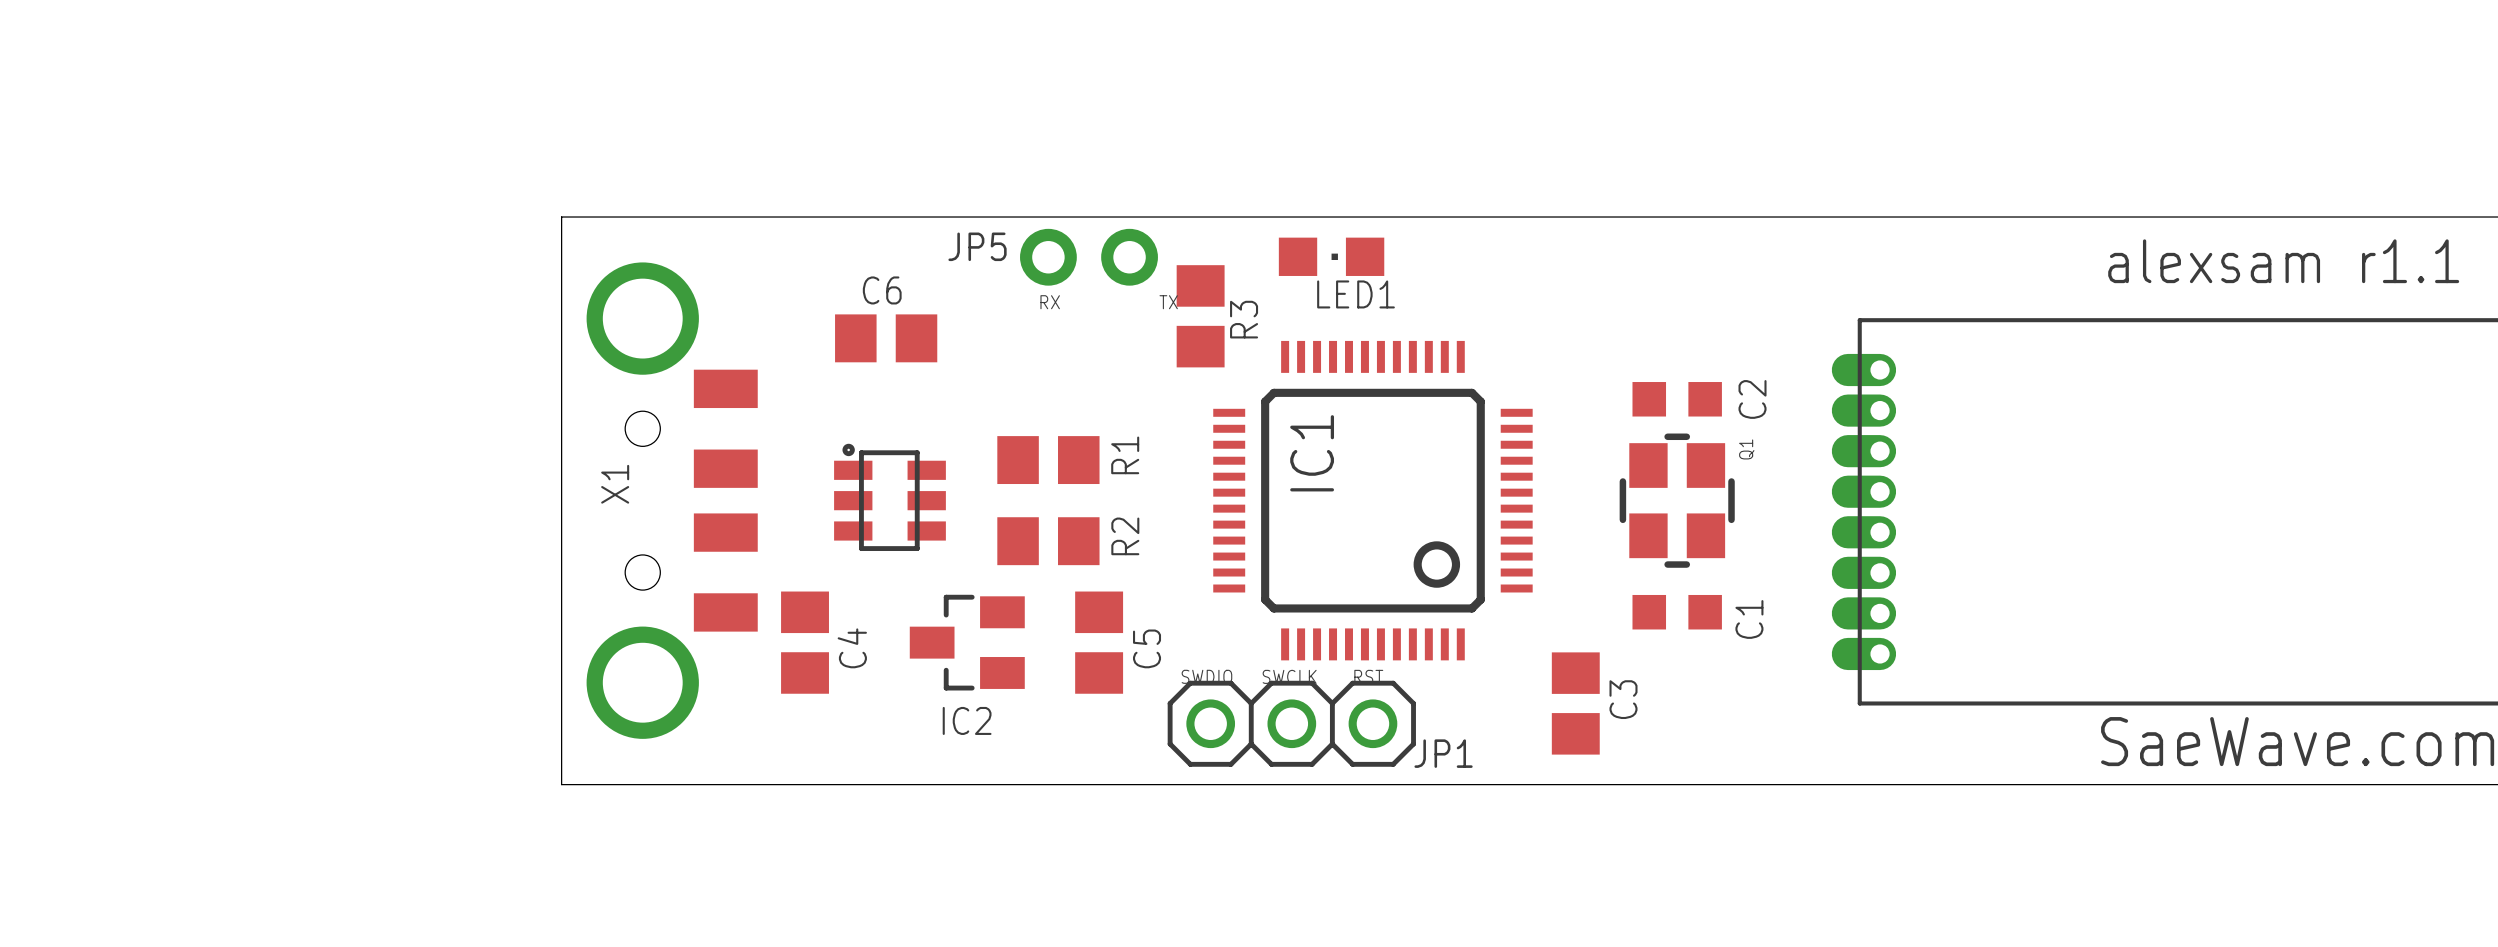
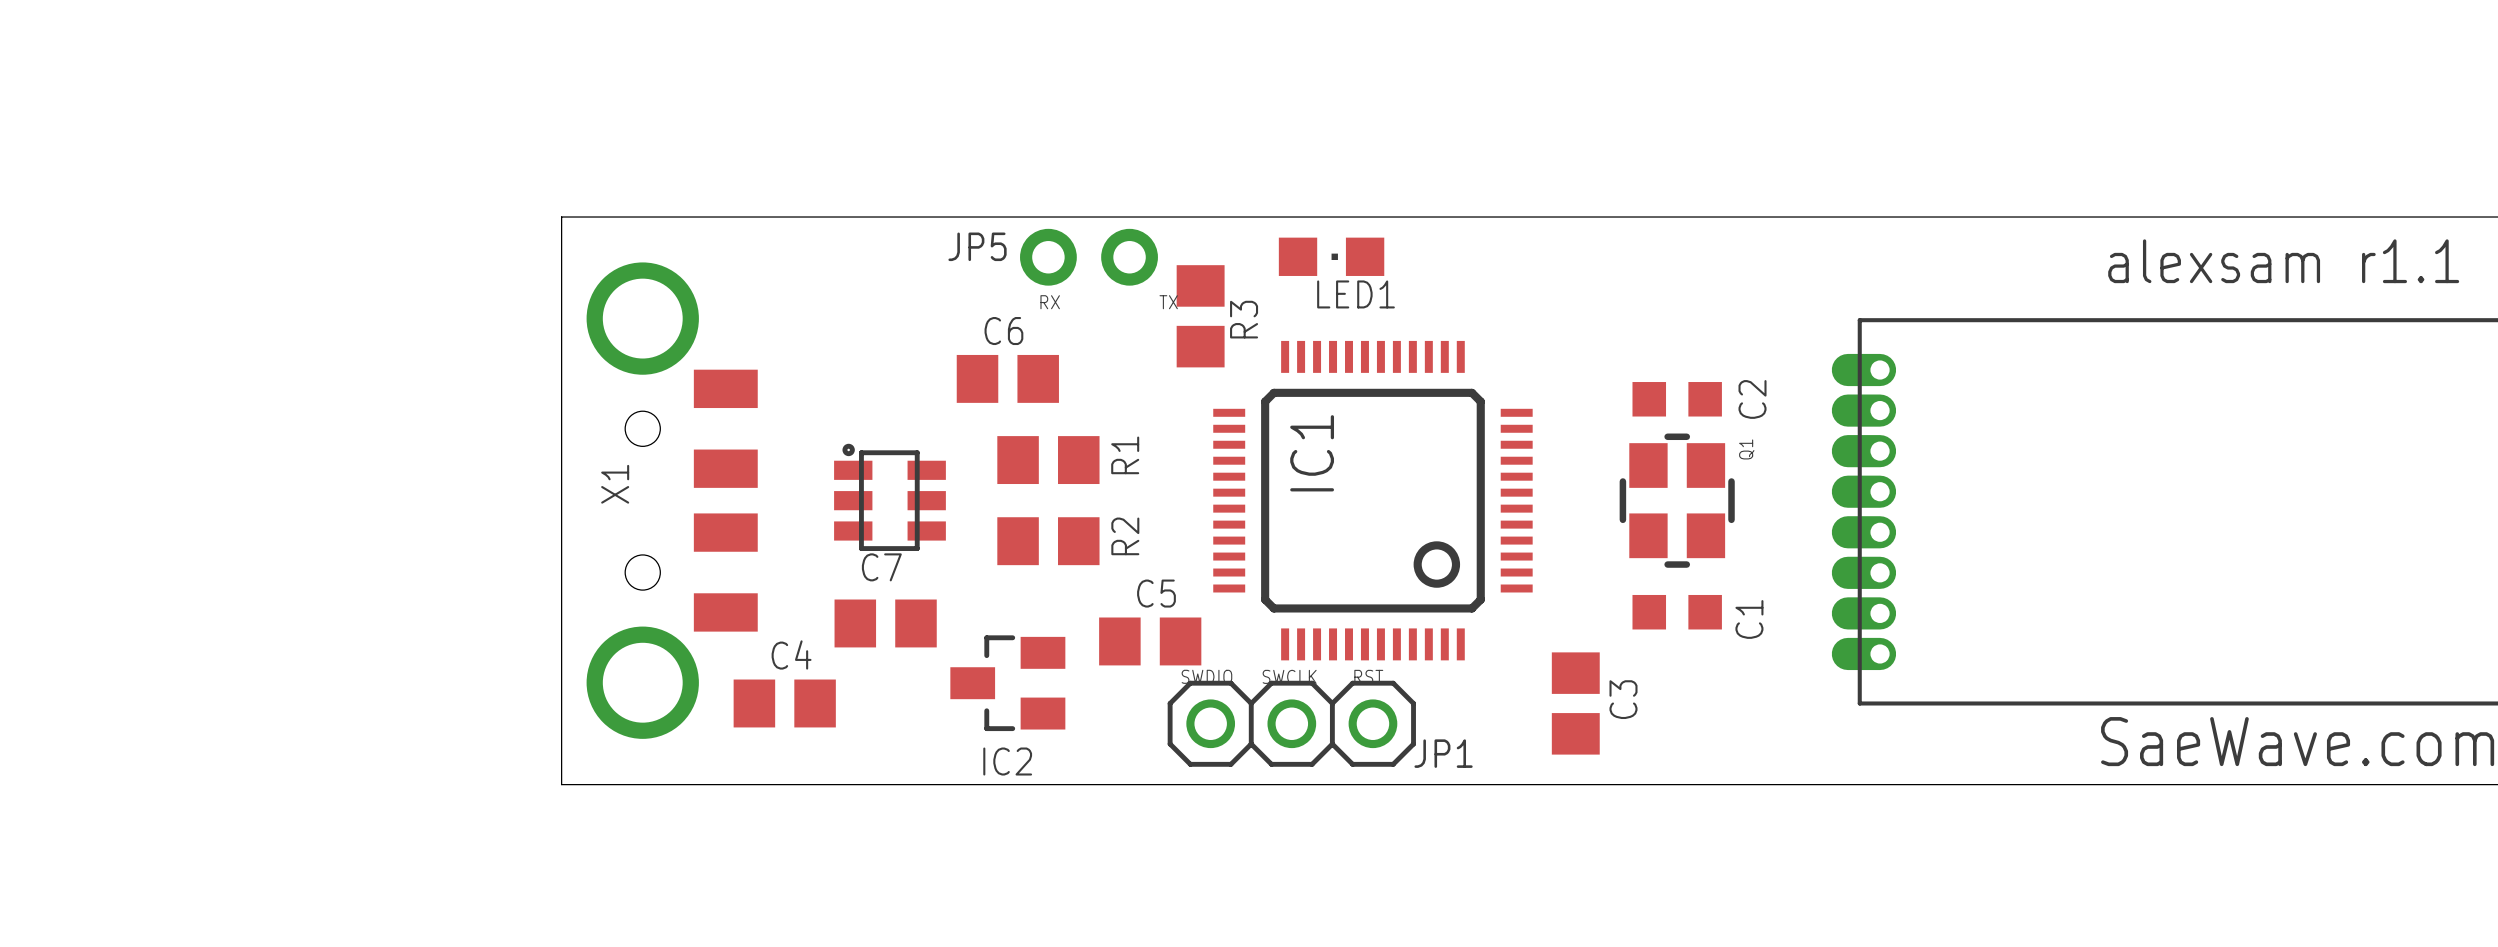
C6 position: (886, 338) -> (1007, 378)
C7: none -> (885, 623)
C4 rotation: 0° (805, 642) -> 90° clockwise (784, 703)
C4 position: (805, 642) -> (784, 703)
IC2 position: (967, 642) -> (1007, 683)
C5 rotation: 0° (1099, 642) -> 90° clockwise (1150, 641)
C4 name position: C4 (852, 648) -> C4 (791, 654)
C5 name position: C5 (1147, 648) -> C5 (1156, 593)

